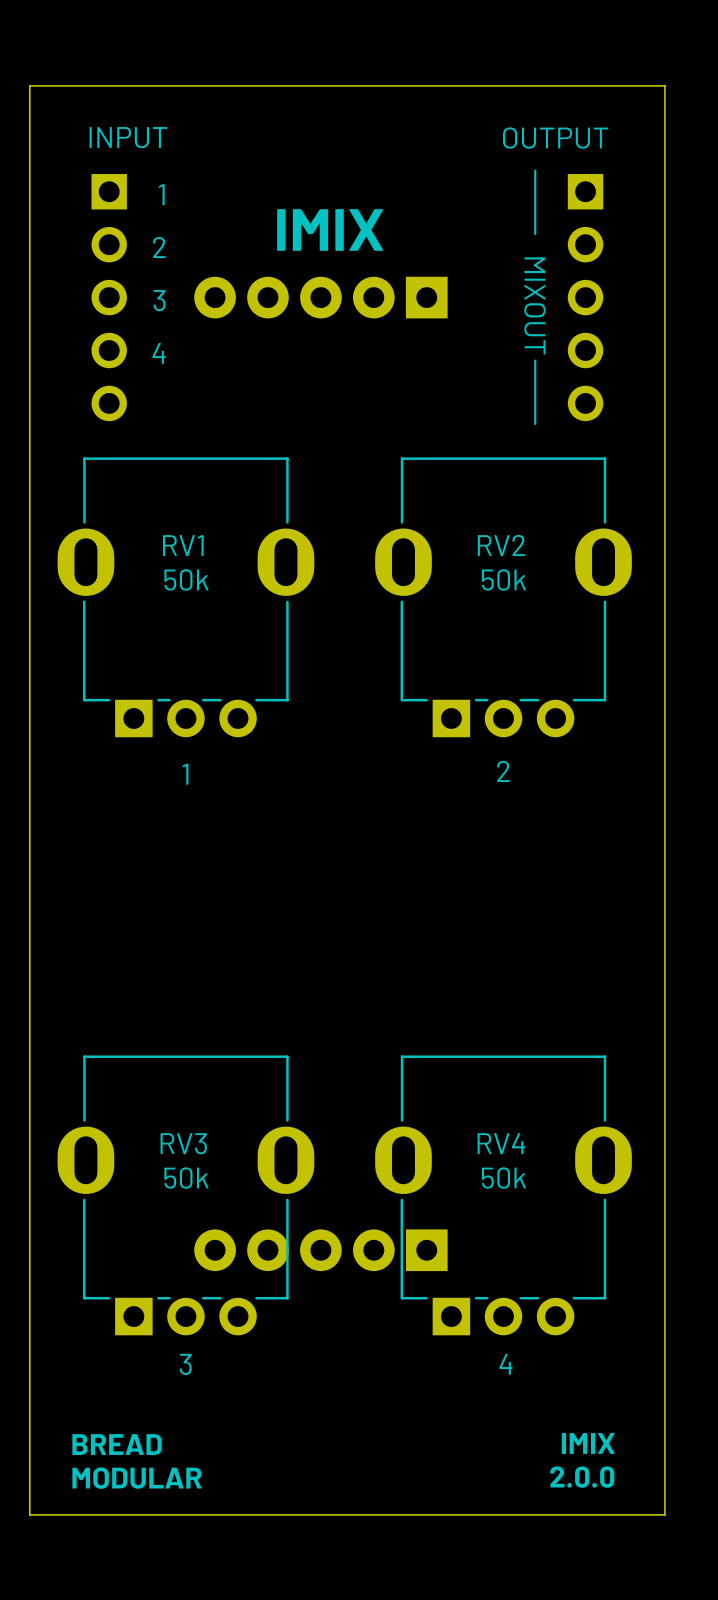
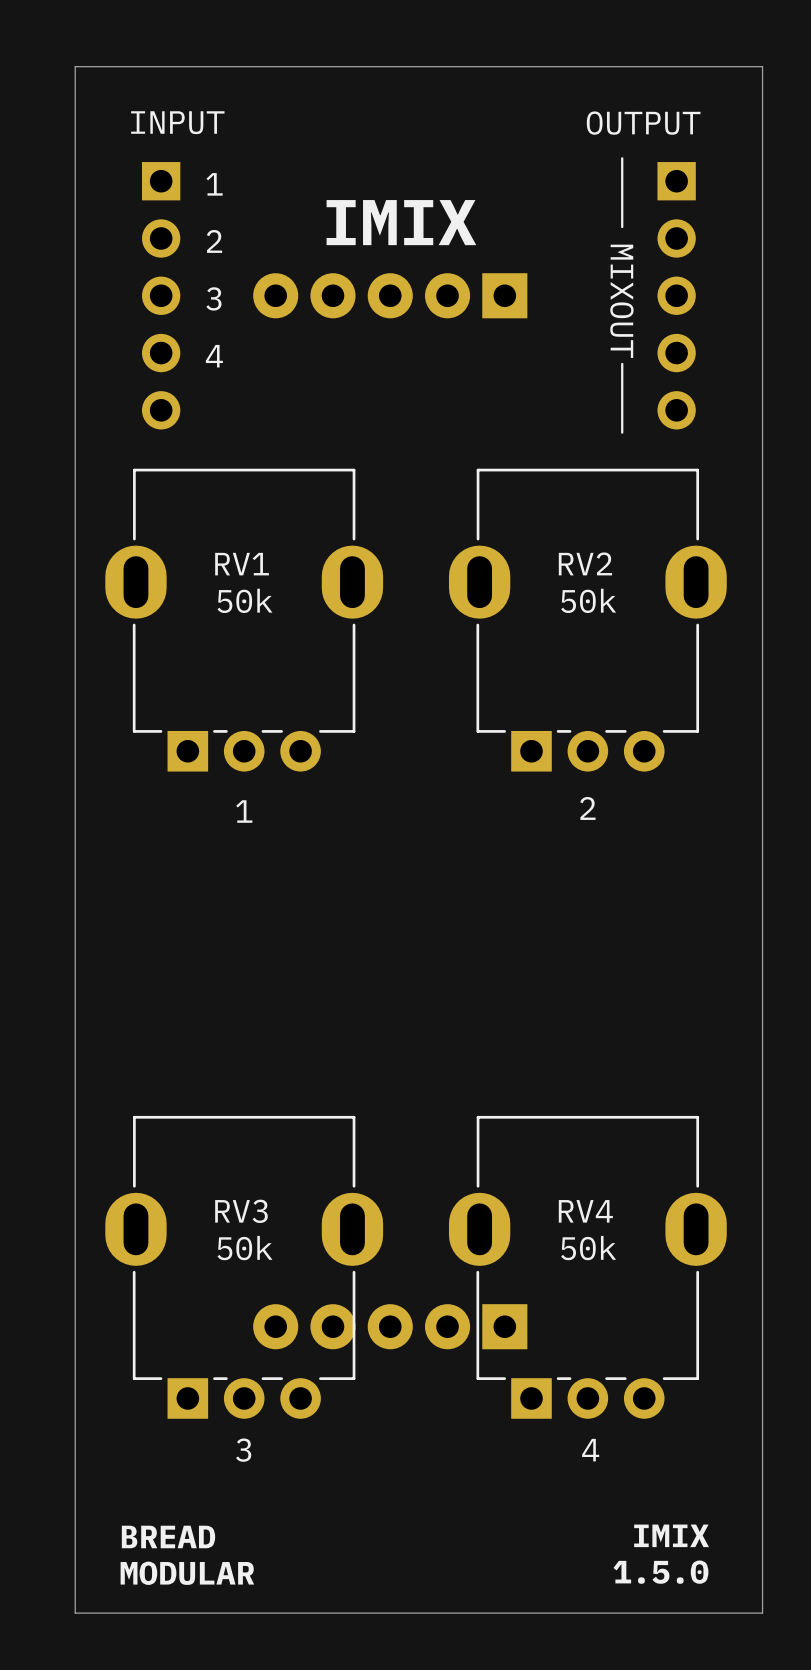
text: 2.0.0 (582, 1477) -> 1.5.0 (660, 1572)

